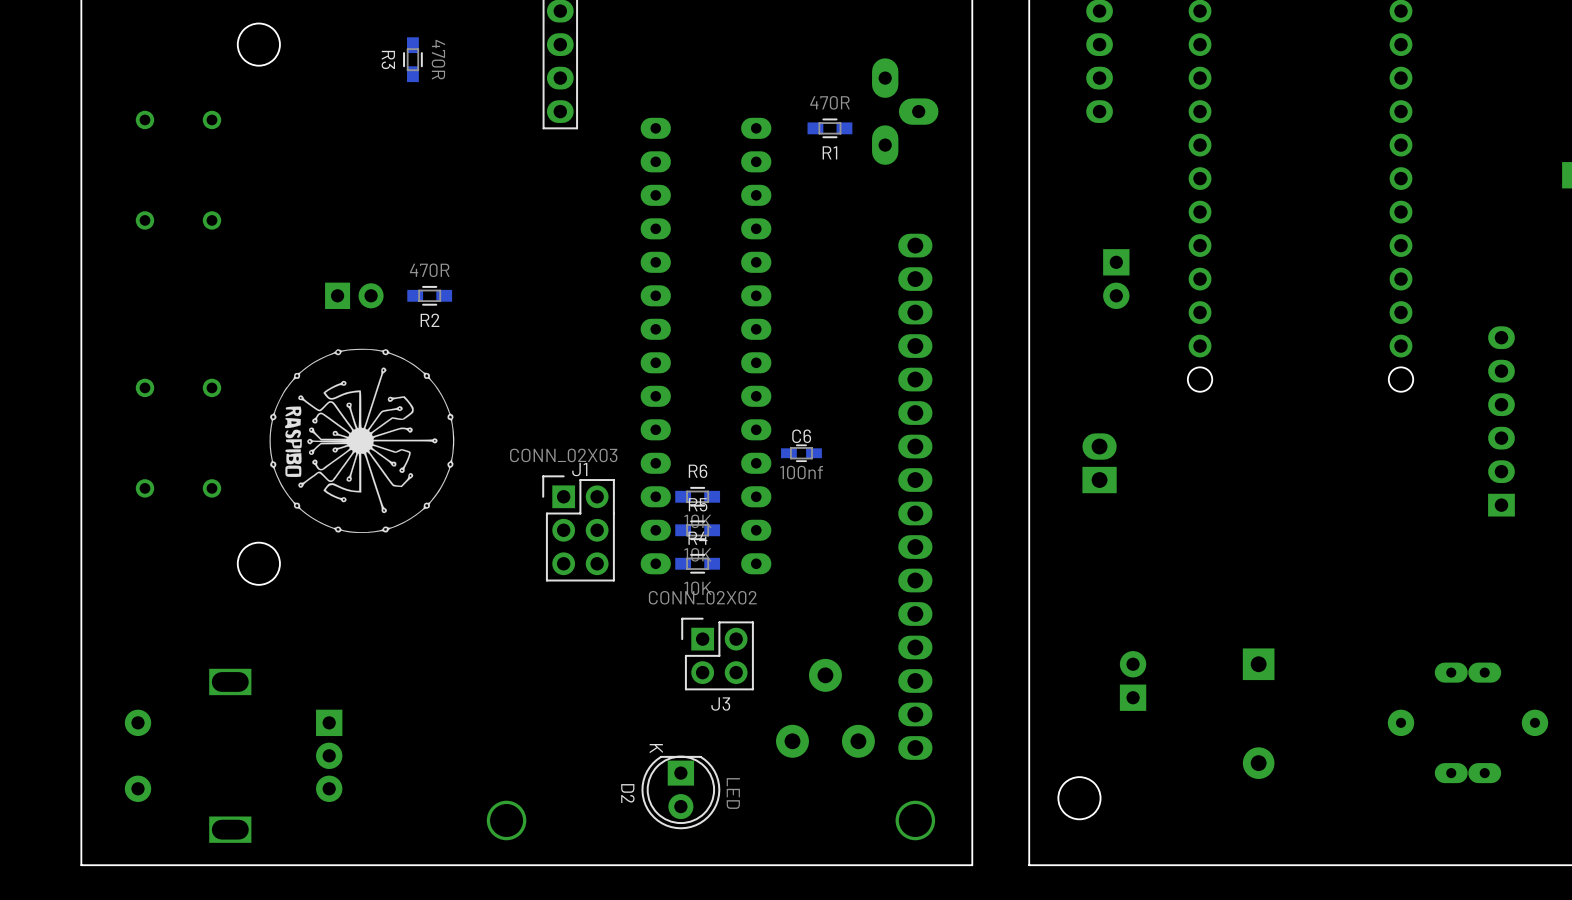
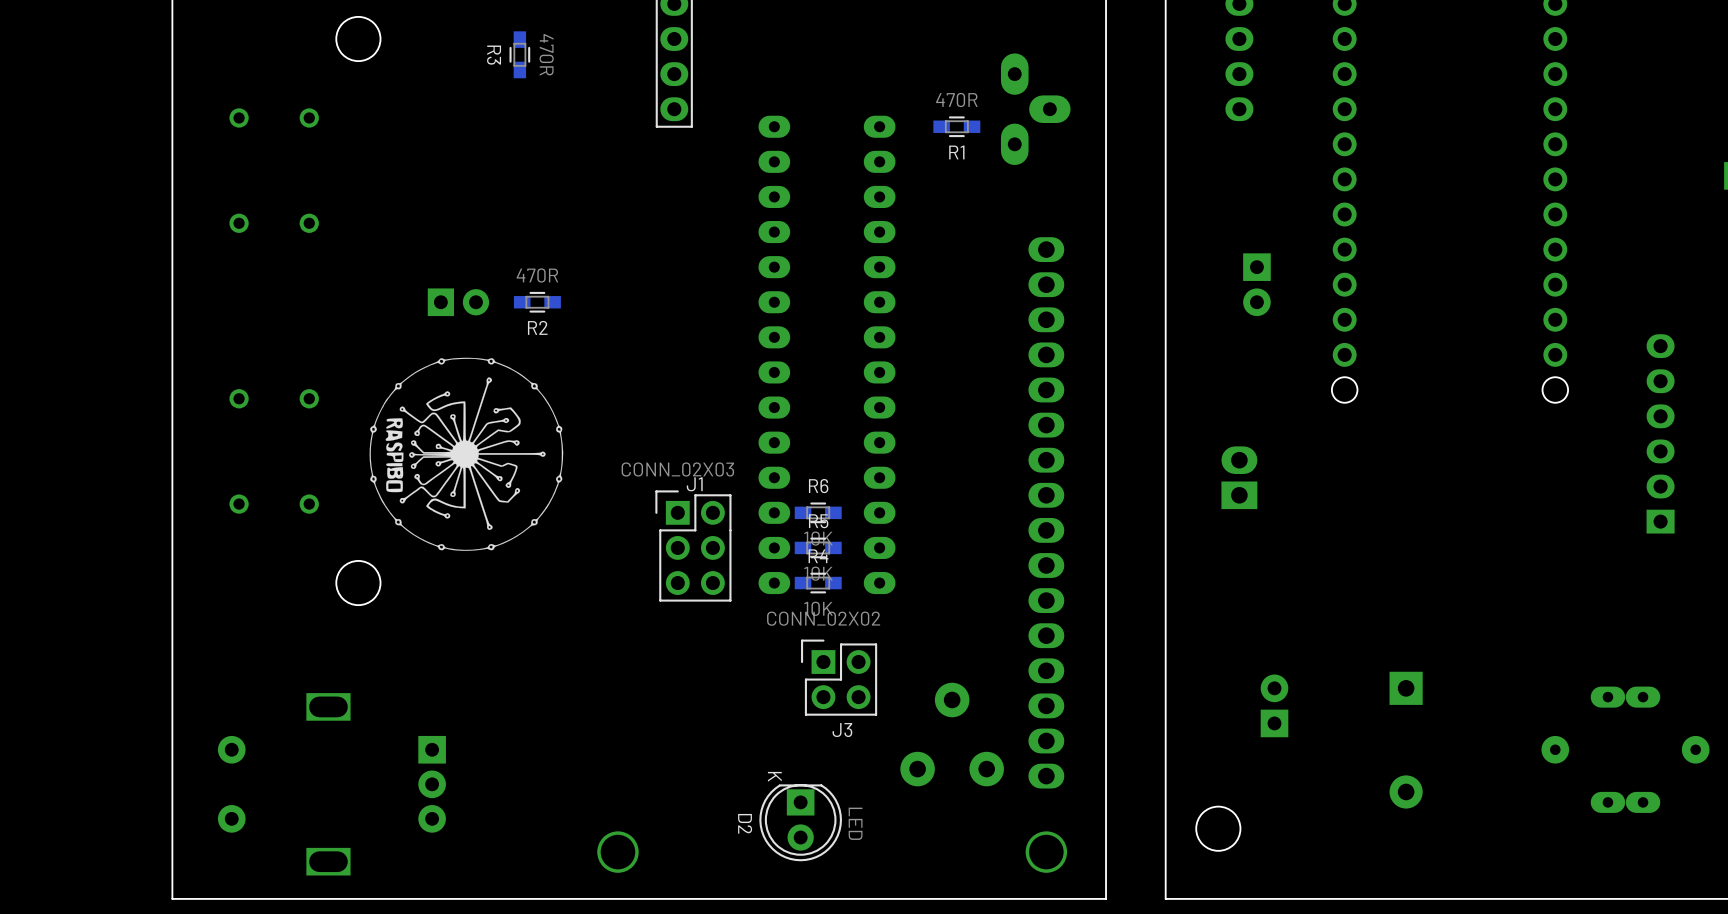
C6: 100nf (801, 453) -> none

